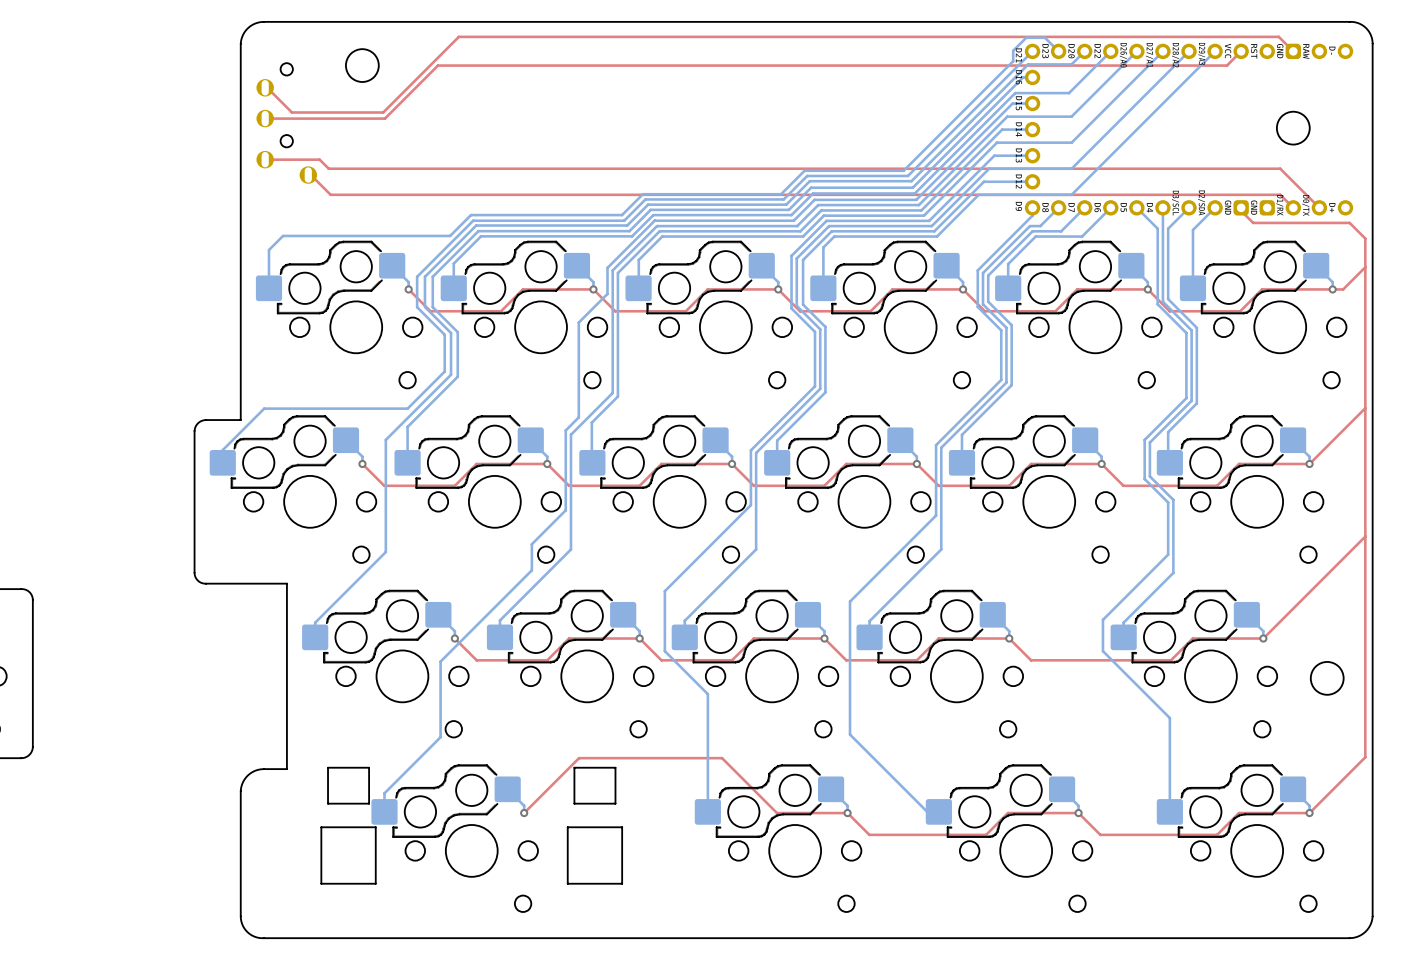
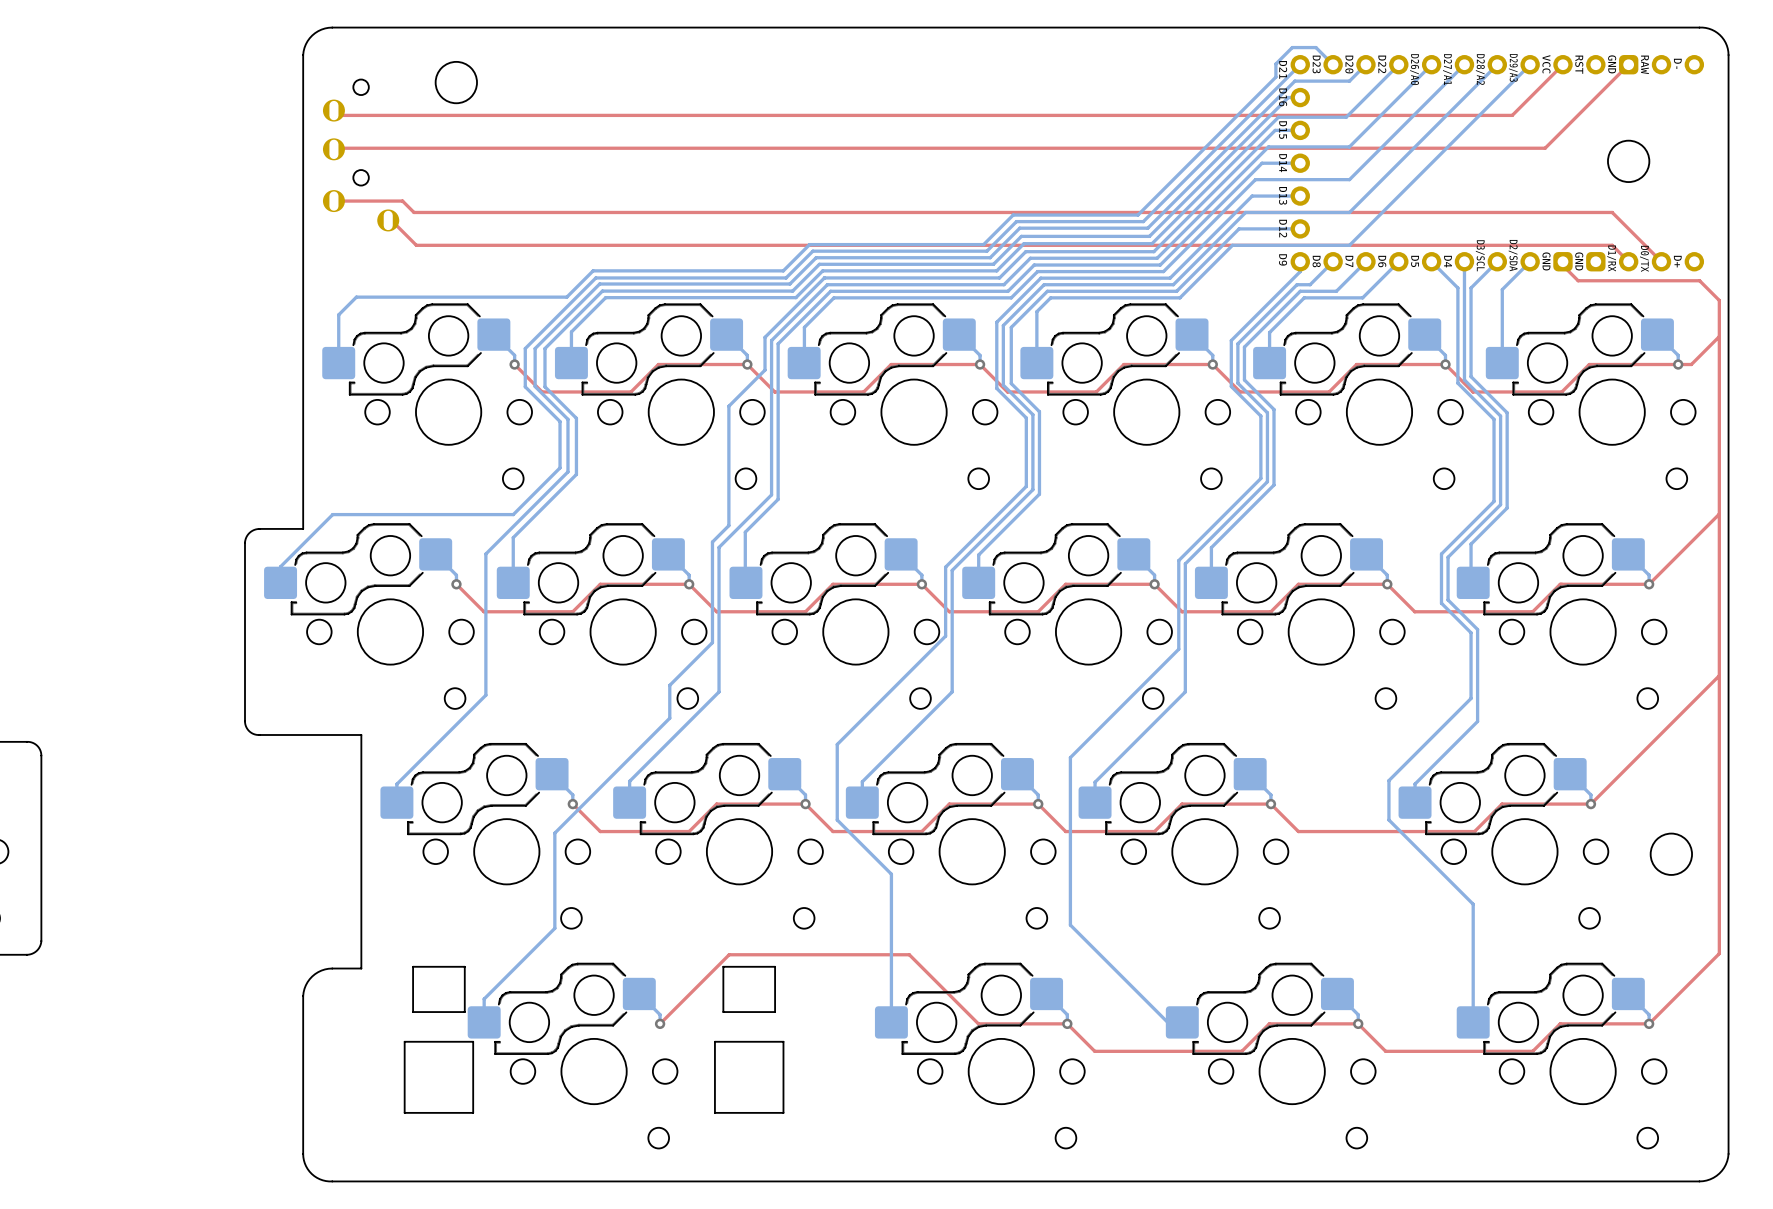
top track: (1293, 51) (1278, 36) (458, 36) (383, 112) (291, 112) (265, 87) -> (1628, 64) (1545, 148) (333, 149)
top track: (1226, 65) (437, 65) (384, 118) (265, 118) -> (1545, 82) (1512, 115) (338, 115) (333, 110)

